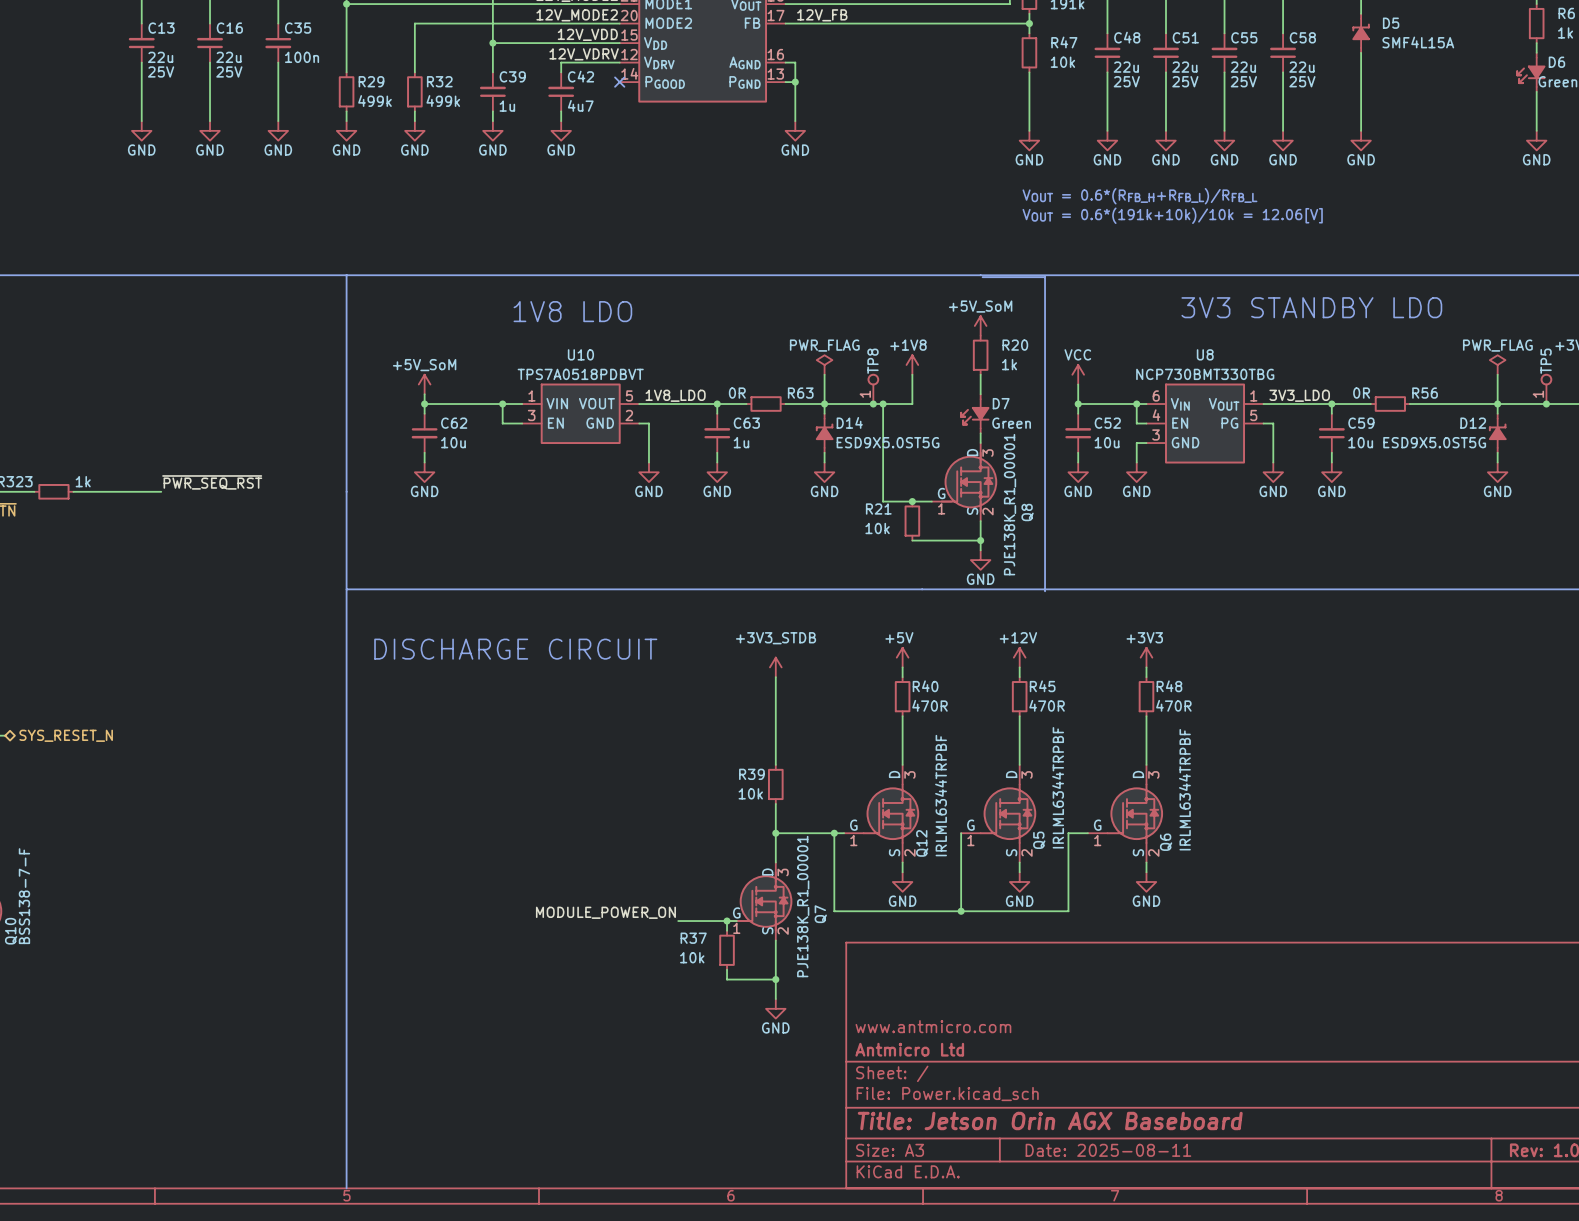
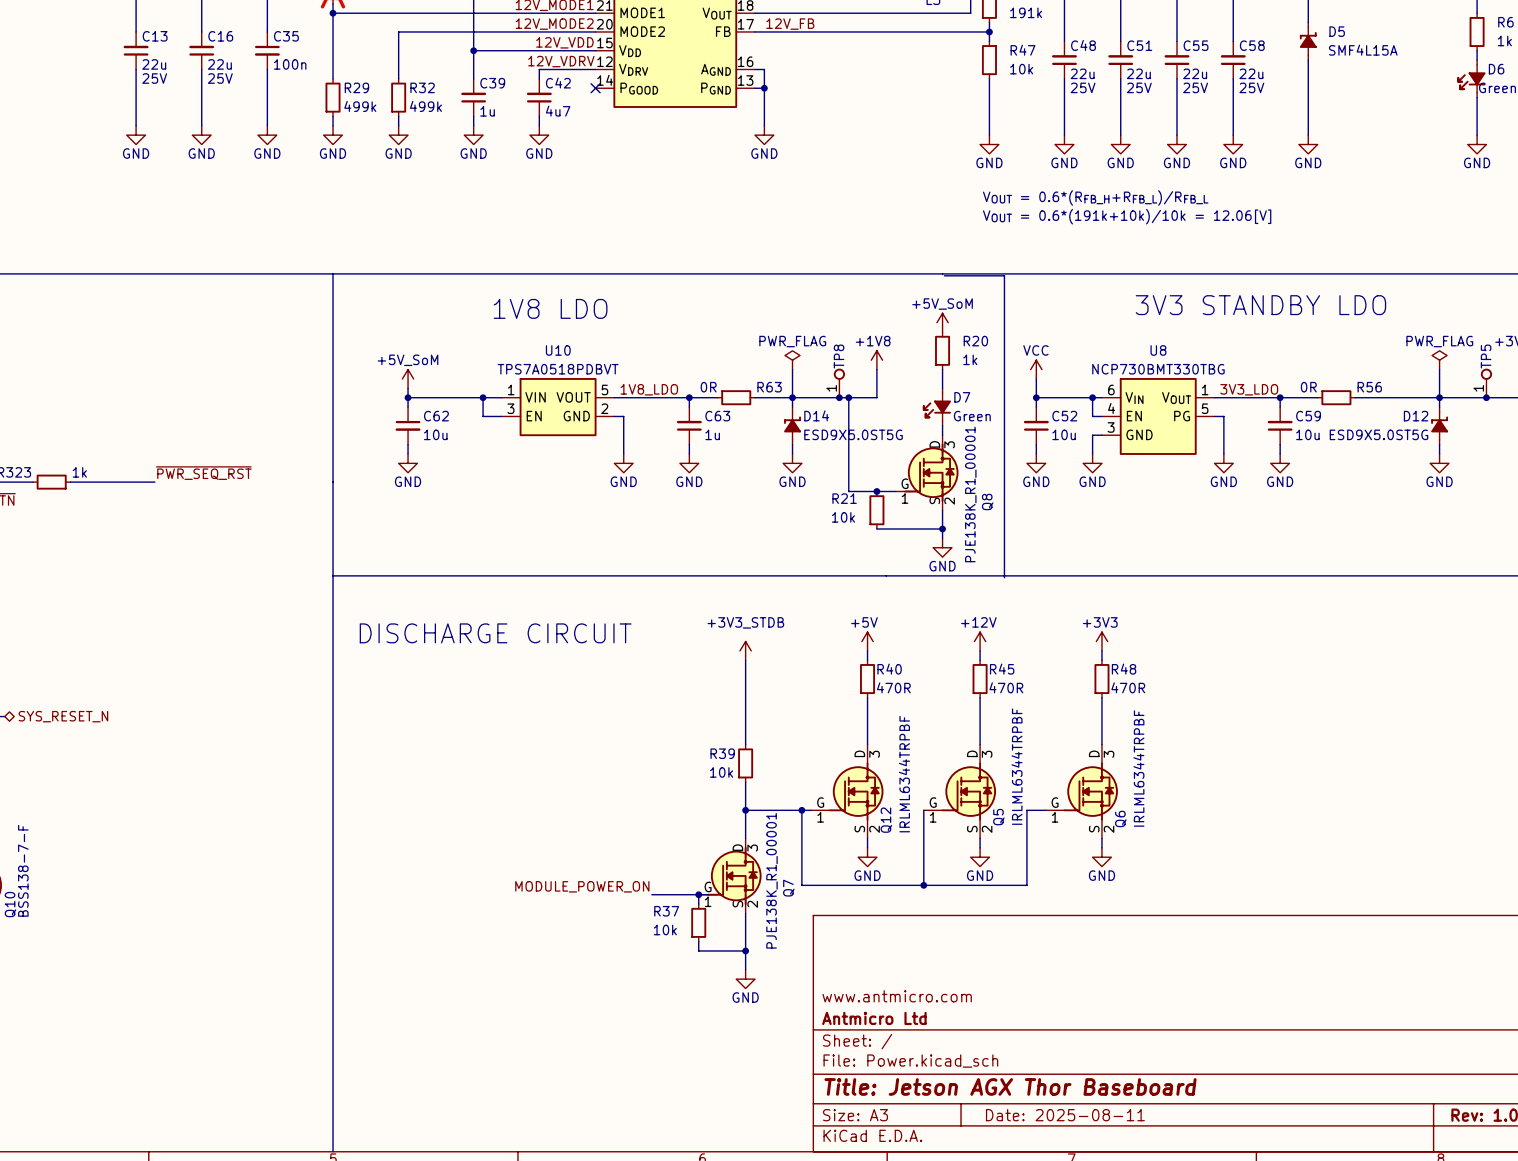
title block: Title: Jetson Orin AGX Baseboard (1050, 1121) -> Title: Jetson AGX Thor Baseboard (1010, 1086)

